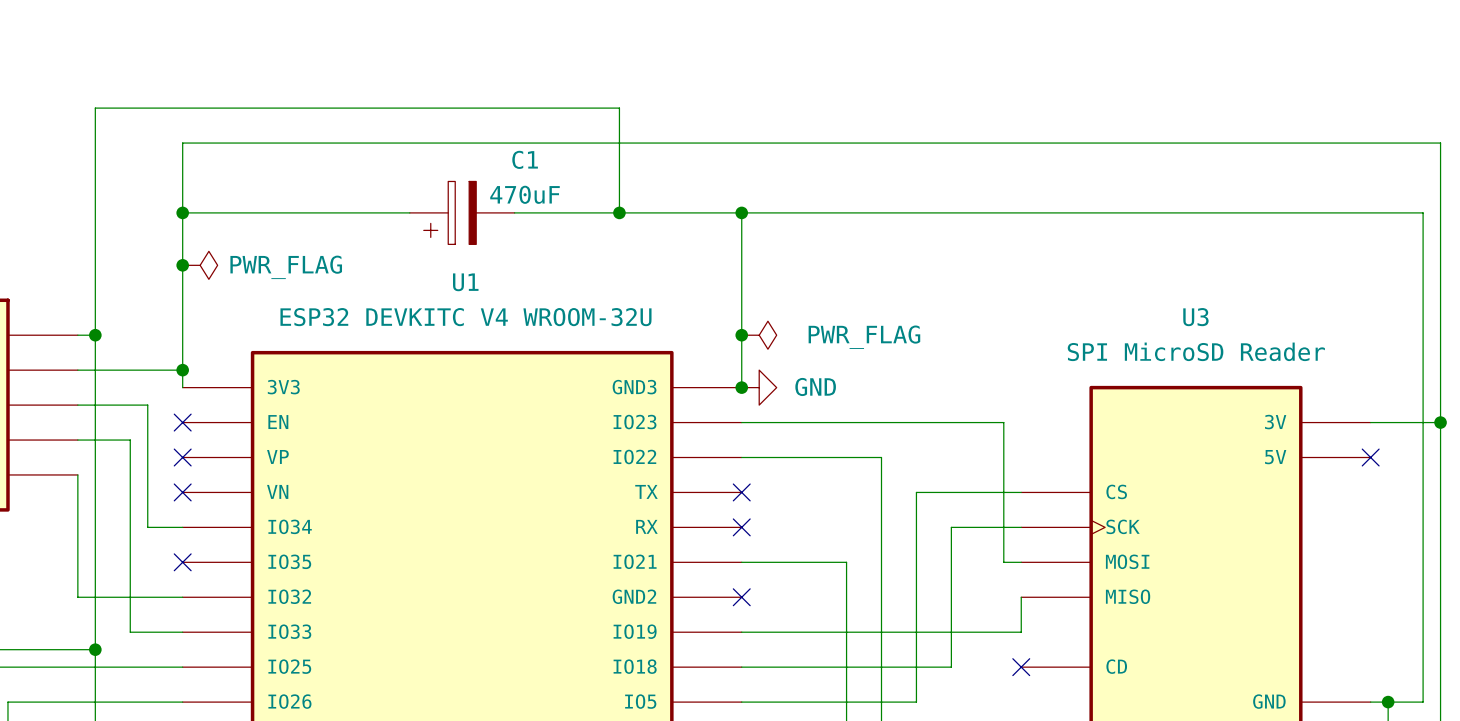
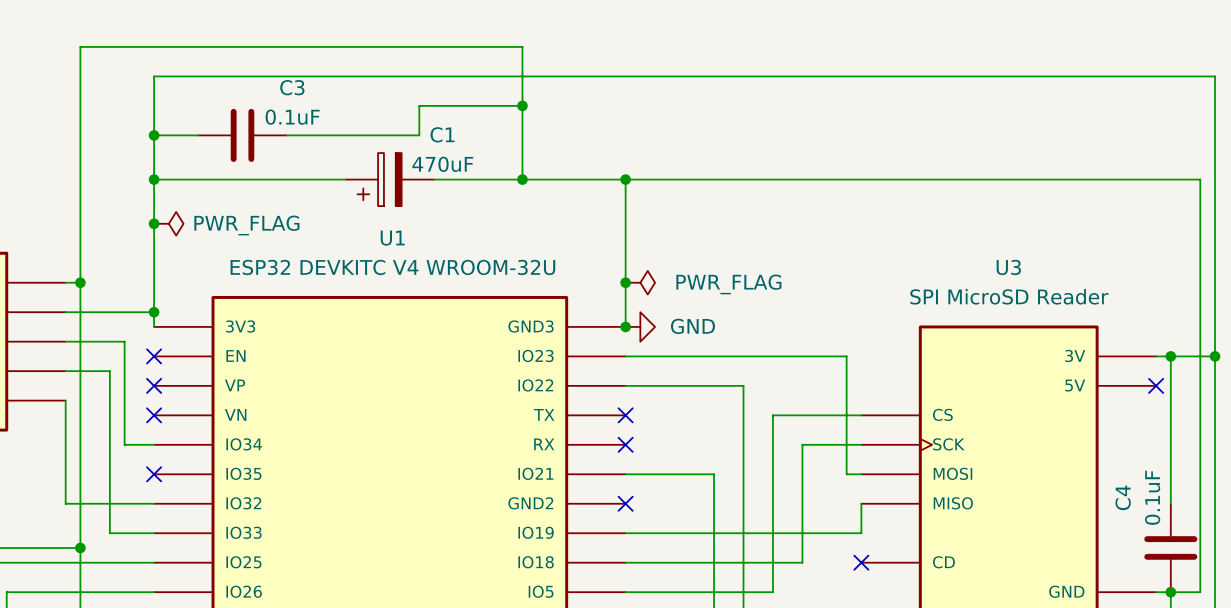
wire: (95, 108) (619, 108) -> (80, 91) (80, 46) (522, 46) (522, 91)
wire: none -> (522, 105) (419, 105) (419, 135) (286, 135)
junction: none -> (522, 105)
wire: (182, 143) (1440, 143) -> (154, 120) (154, 76) (1215, 76) (1215, 120)
wire: none -> (154, 135) (198, 135)
junction: none -> (154, 135)
C3: none -> 0.1uF (242, 135)
wire: none -> (1170, 356) (1170, 503)
junction: none -> (1170, 356)
C4: none -> 0.1uF (1170, 547)

